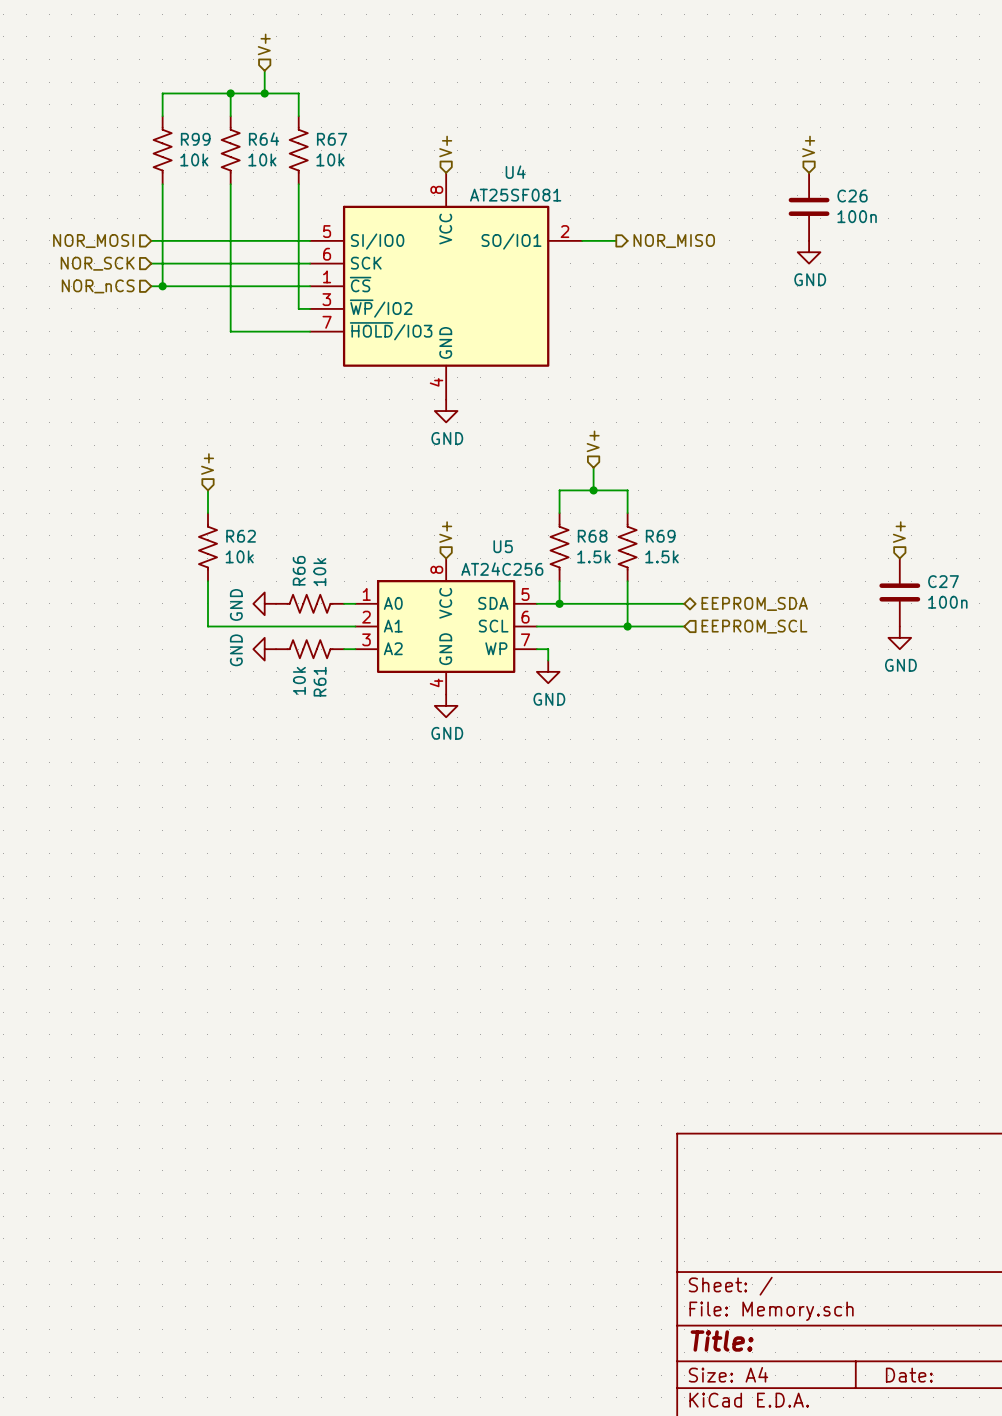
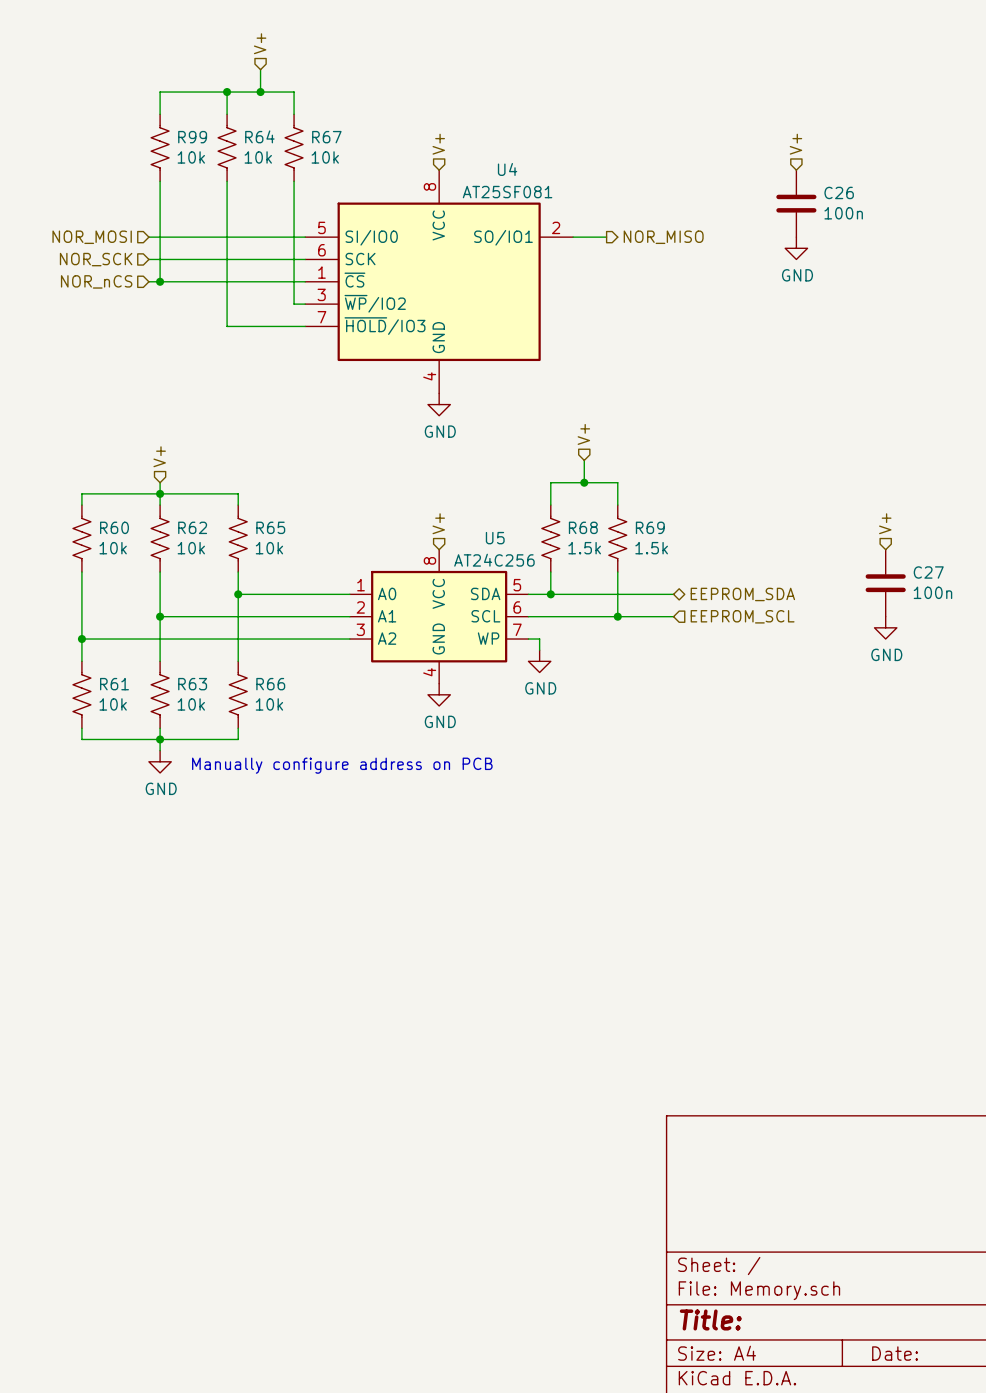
hierarchical label position: V+ (207, 464) -> V+ (159, 456)
wire: (207, 490) (207, 513) -> (160, 482) (160, 505)
junction: none -> (160, 493)
wire: none -> (81, 505) (81, 493) (238, 493) (238, 505)
R60: none -> 10k (81, 538)
R62 position: (207, 547) -> (160, 538)
R65: none -> 10k (238, 538)
wire: none -> (81, 572) (81, 661)
wire: none -> (160, 572) (160, 661)
wire: (207, 581) (207, 626) -> (160, 616) (204, 616)
wire: none -> (238, 572) (238, 661)
wire: none -> (238, 594) (338, 594)
junction: none -> (238, 594)
power symbol: GND (264, 603) -> none
R66 rotation: 0° (310, 603) -> 90° clockwise (238, 694)
R66 position: (310, 603) -> (238, 694)
junction: none -> (160, 616)
wire: none -> (81, 639) (338, 639)
junction: none -> (81, 639)
power symbol: GND (264, 649) -> none
R61 rotation: 0° (310, 649) -> 90° clockwise (81, 694)
R61 position: (310, 649) -> (81, 694)
R61 value position: 10k (299, 680) -> 10k (113, 704)
R61 name position: R61 (320, 681) -> R61 (114, 684)
R63: none -> 10k (160, 694)
wire: none -> (81, 728) (81, 739) (238, 739) (238, 728)
wire: none -> (160, 728) (160, 750)
junction: none -> (160, 739)
power symbol: none -> GND (160, 761)
text: none -> Manually configure address on PCB (342, 765)

